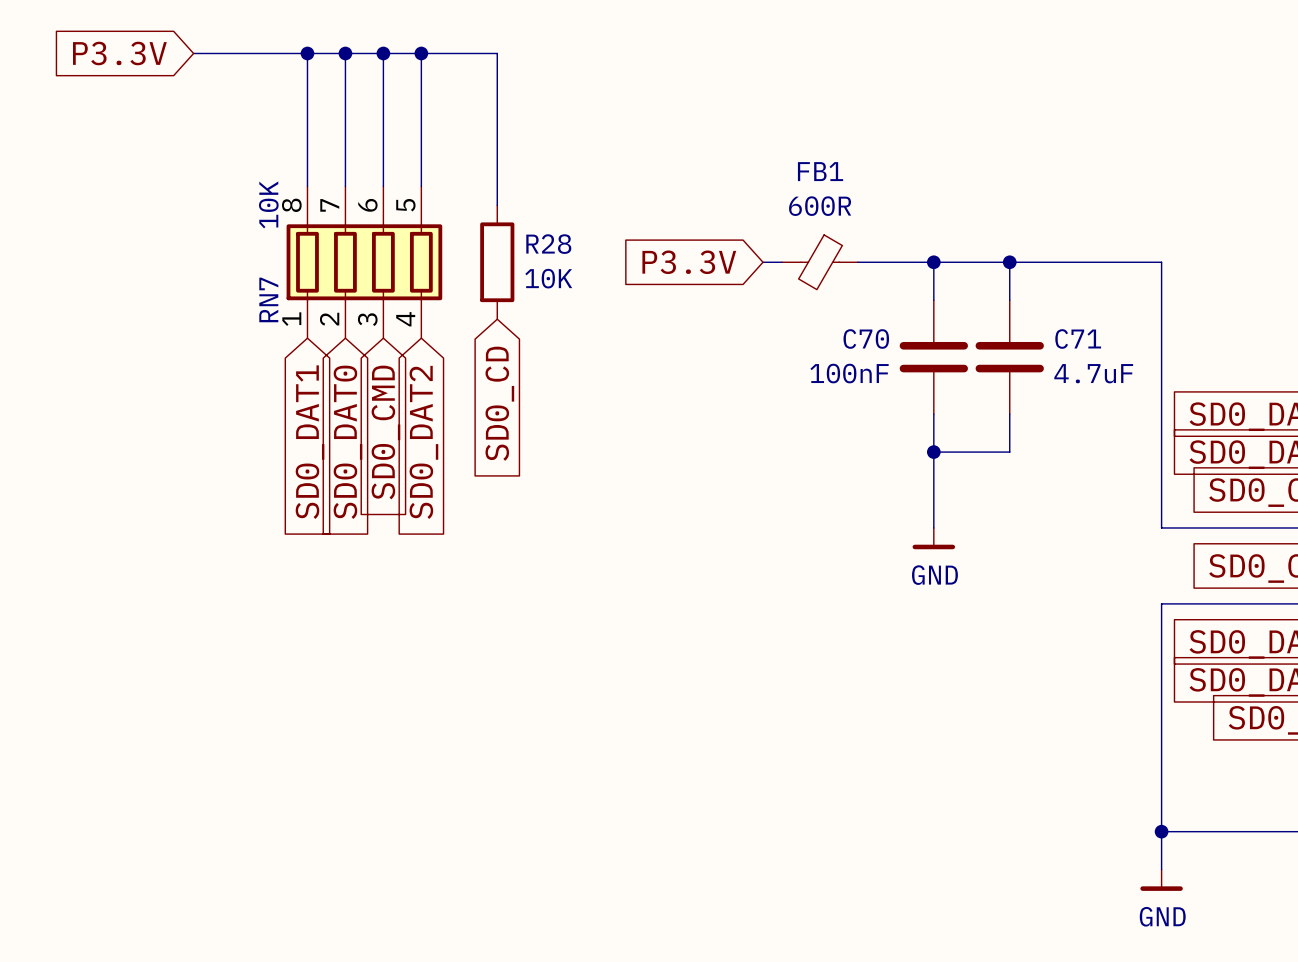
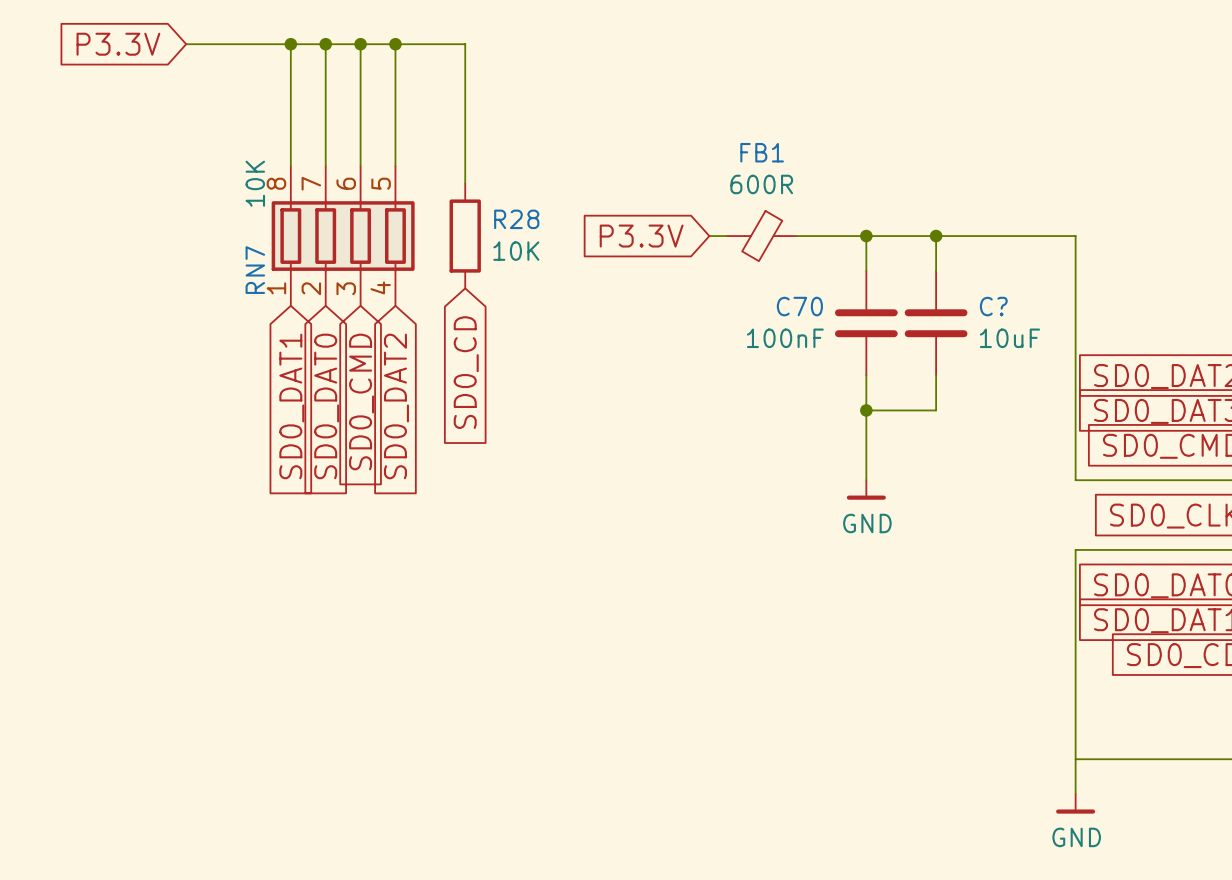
C71 name: C71 (1078, 338) -> C? (993, 306)
C71 value: 4.7uF (1093, 373) -> 10uF (1009, 338)
junction: (1161, 831) -> none

